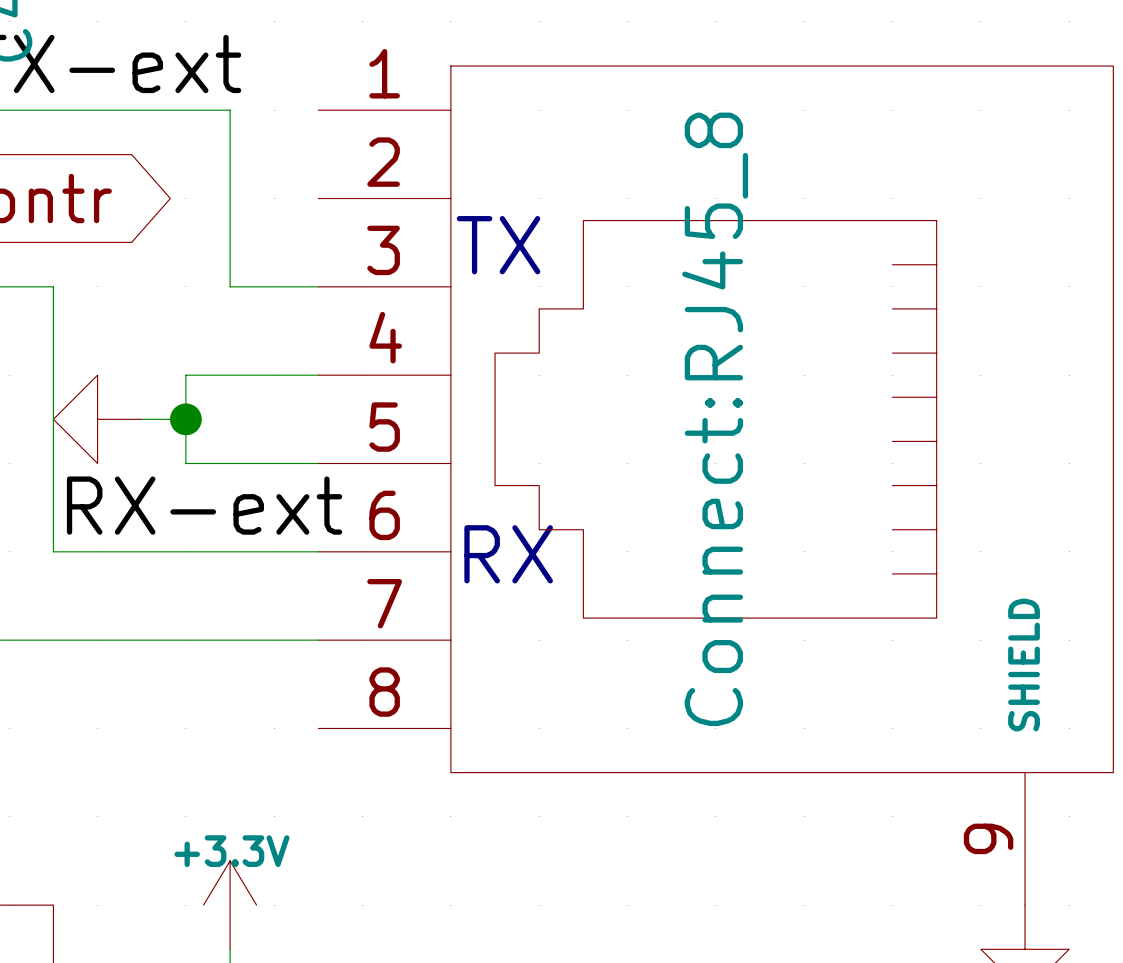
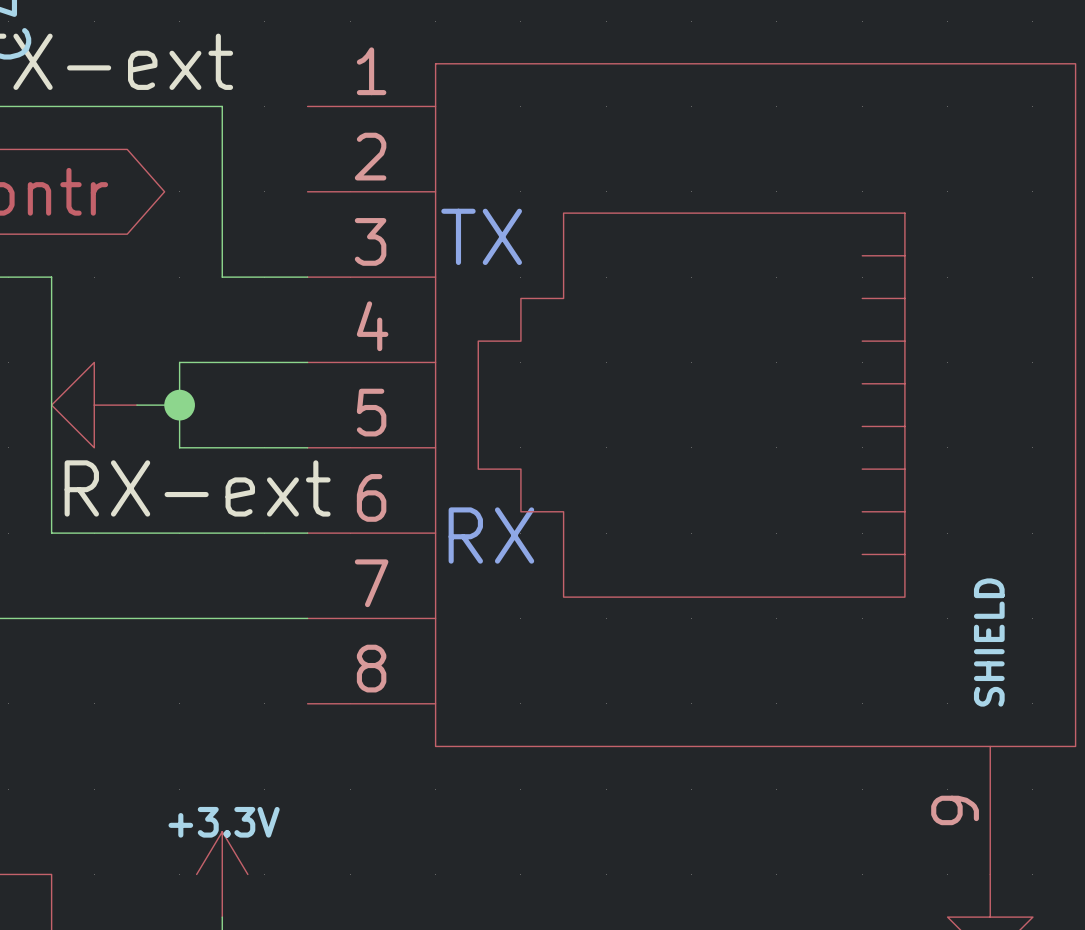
part text: Connect:RJ45_8 (715, 419) -> none

